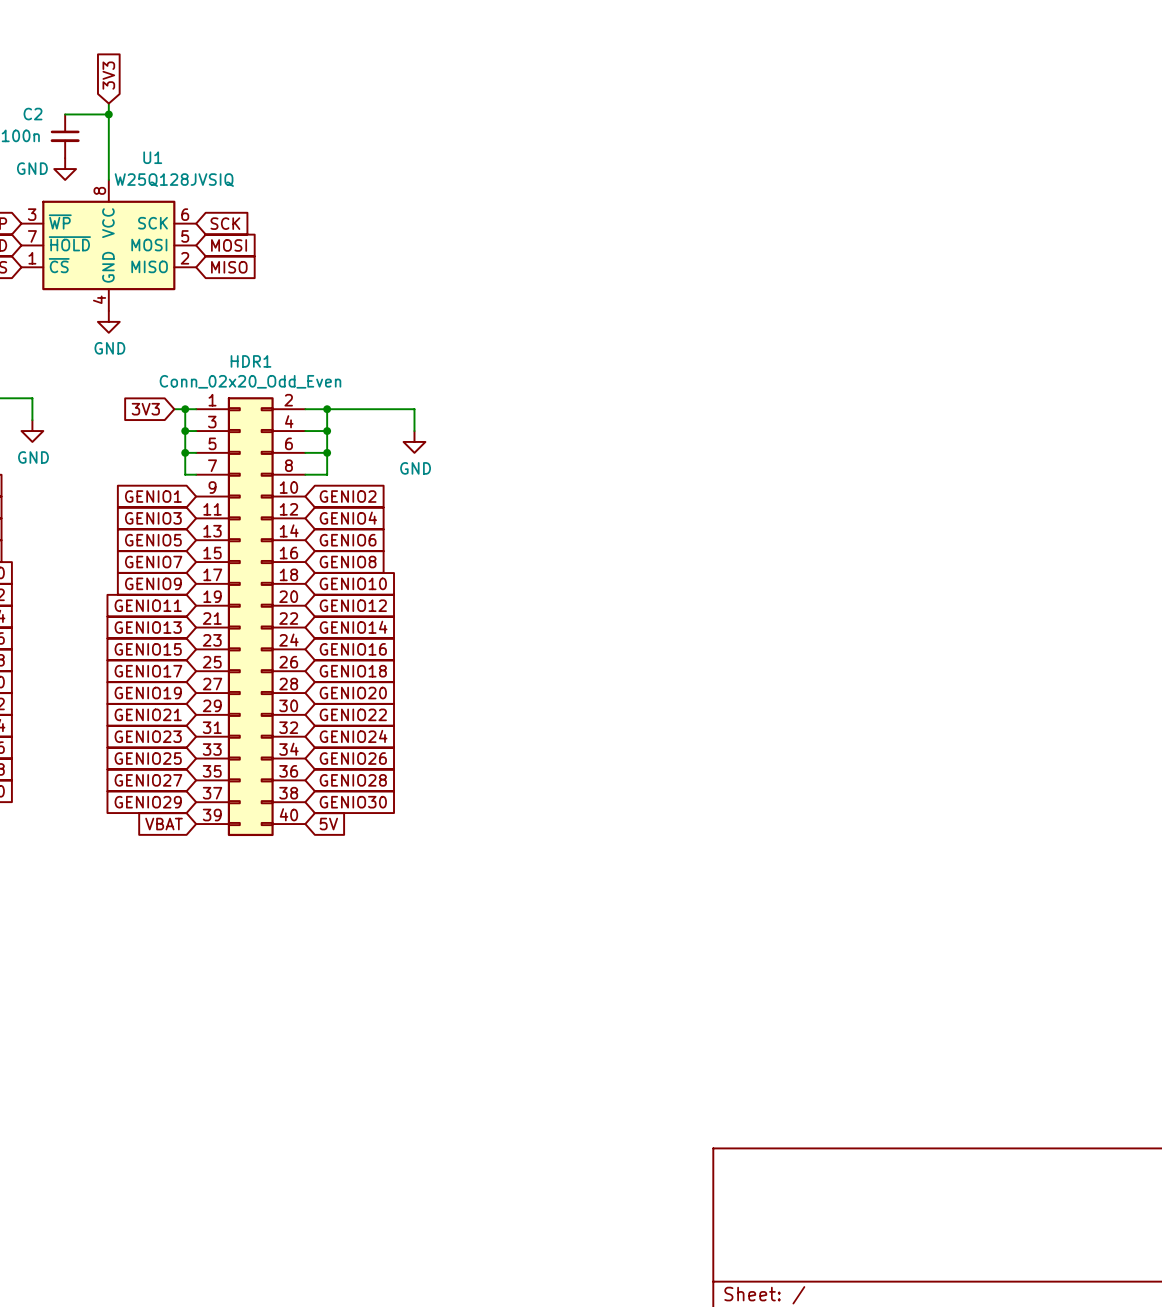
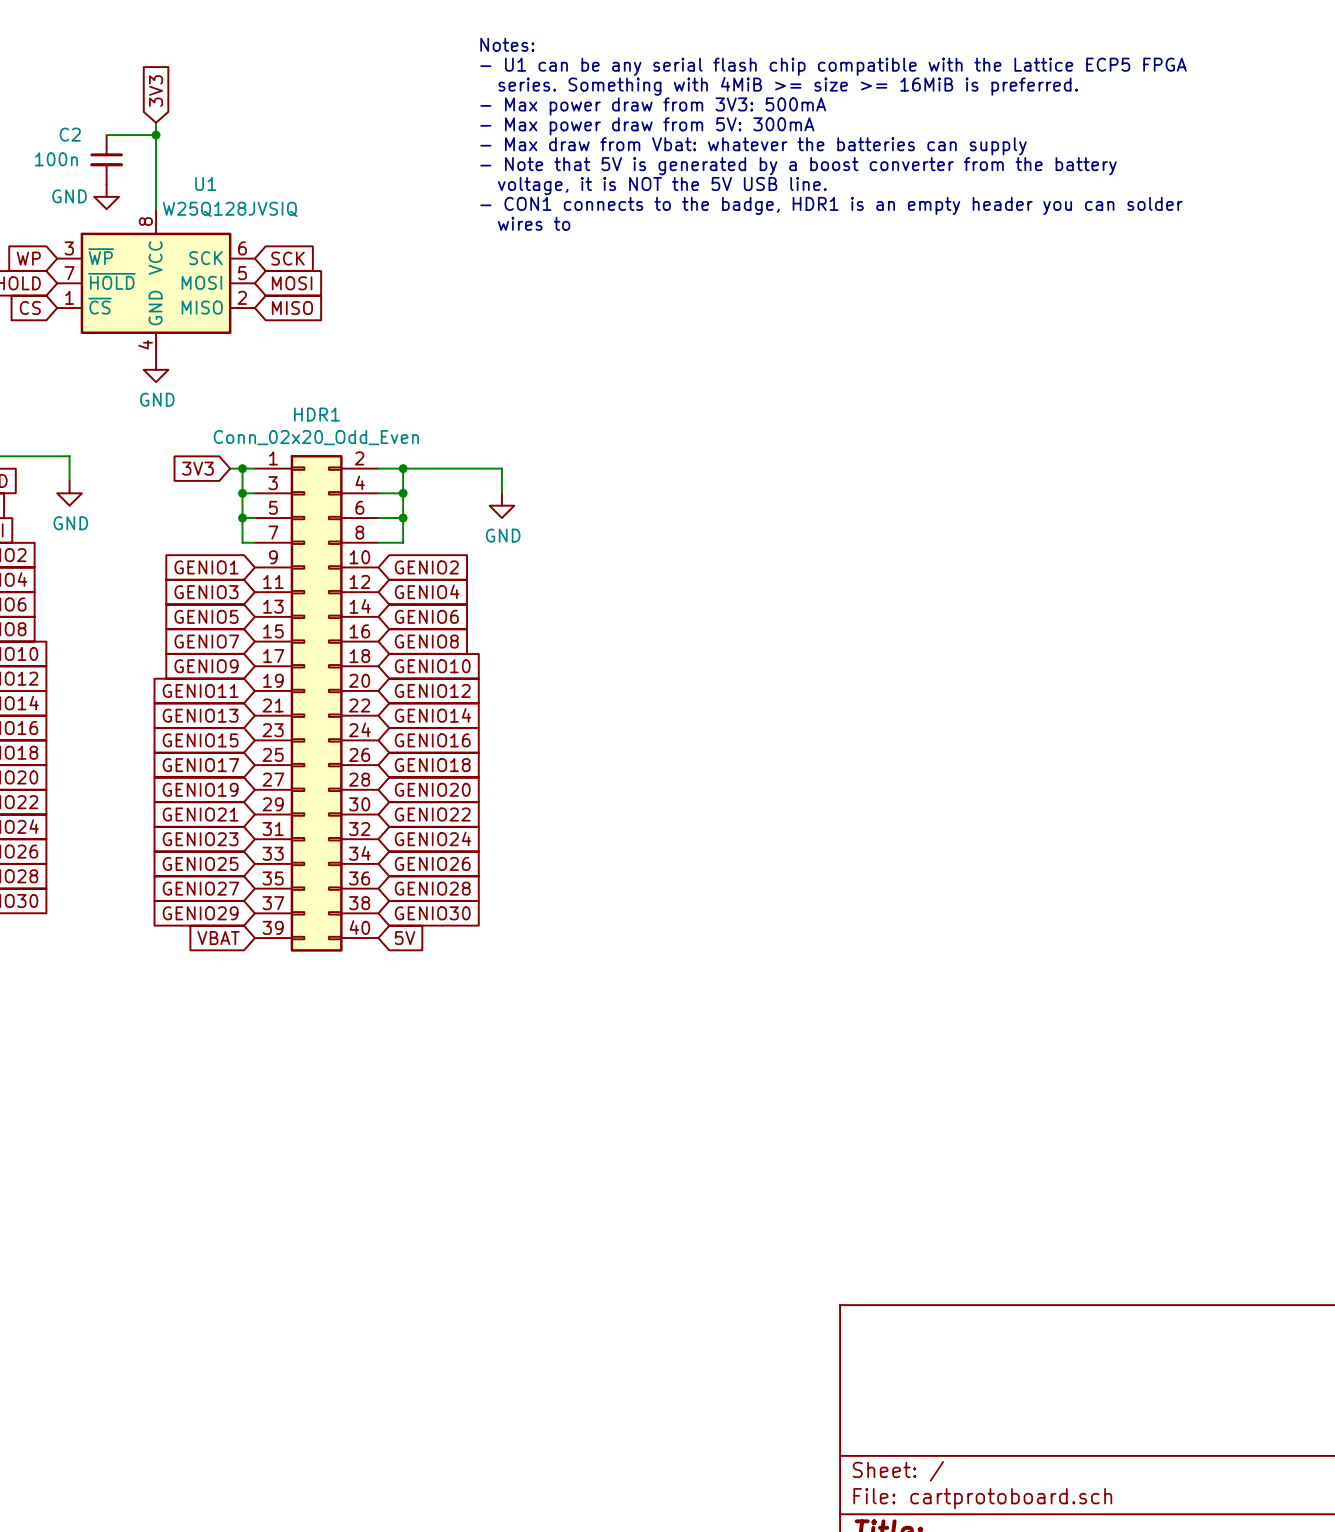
text: none -> Notes: (507, 44)
text: none -> - U1 can be any serial flash chip compatible with the Lattice ECP5 FPGA (833, 66)
text: none -> series. Something with 4MiB >= size >= 16MiB is preferred. (788, 86)
text: none -> - Max power draw from 3V3: 500mA (653, 106)
text: none -> - Max power draw from 5V: 300mA (647, 126)
text: none -> - Max draw from Vbat: whatever the batteries can supply (753, 146)
text: none -> - Note that 5V is generated by a boost converter from the battery (798, 166)
text: none -> voltage, it is NOT the 5V USB line. (662, 186)
text: none -> - CON1 connects to the badge, HDR1 is an empty header you can solder (831, 205)
text: none -> wires to (534, 223)

